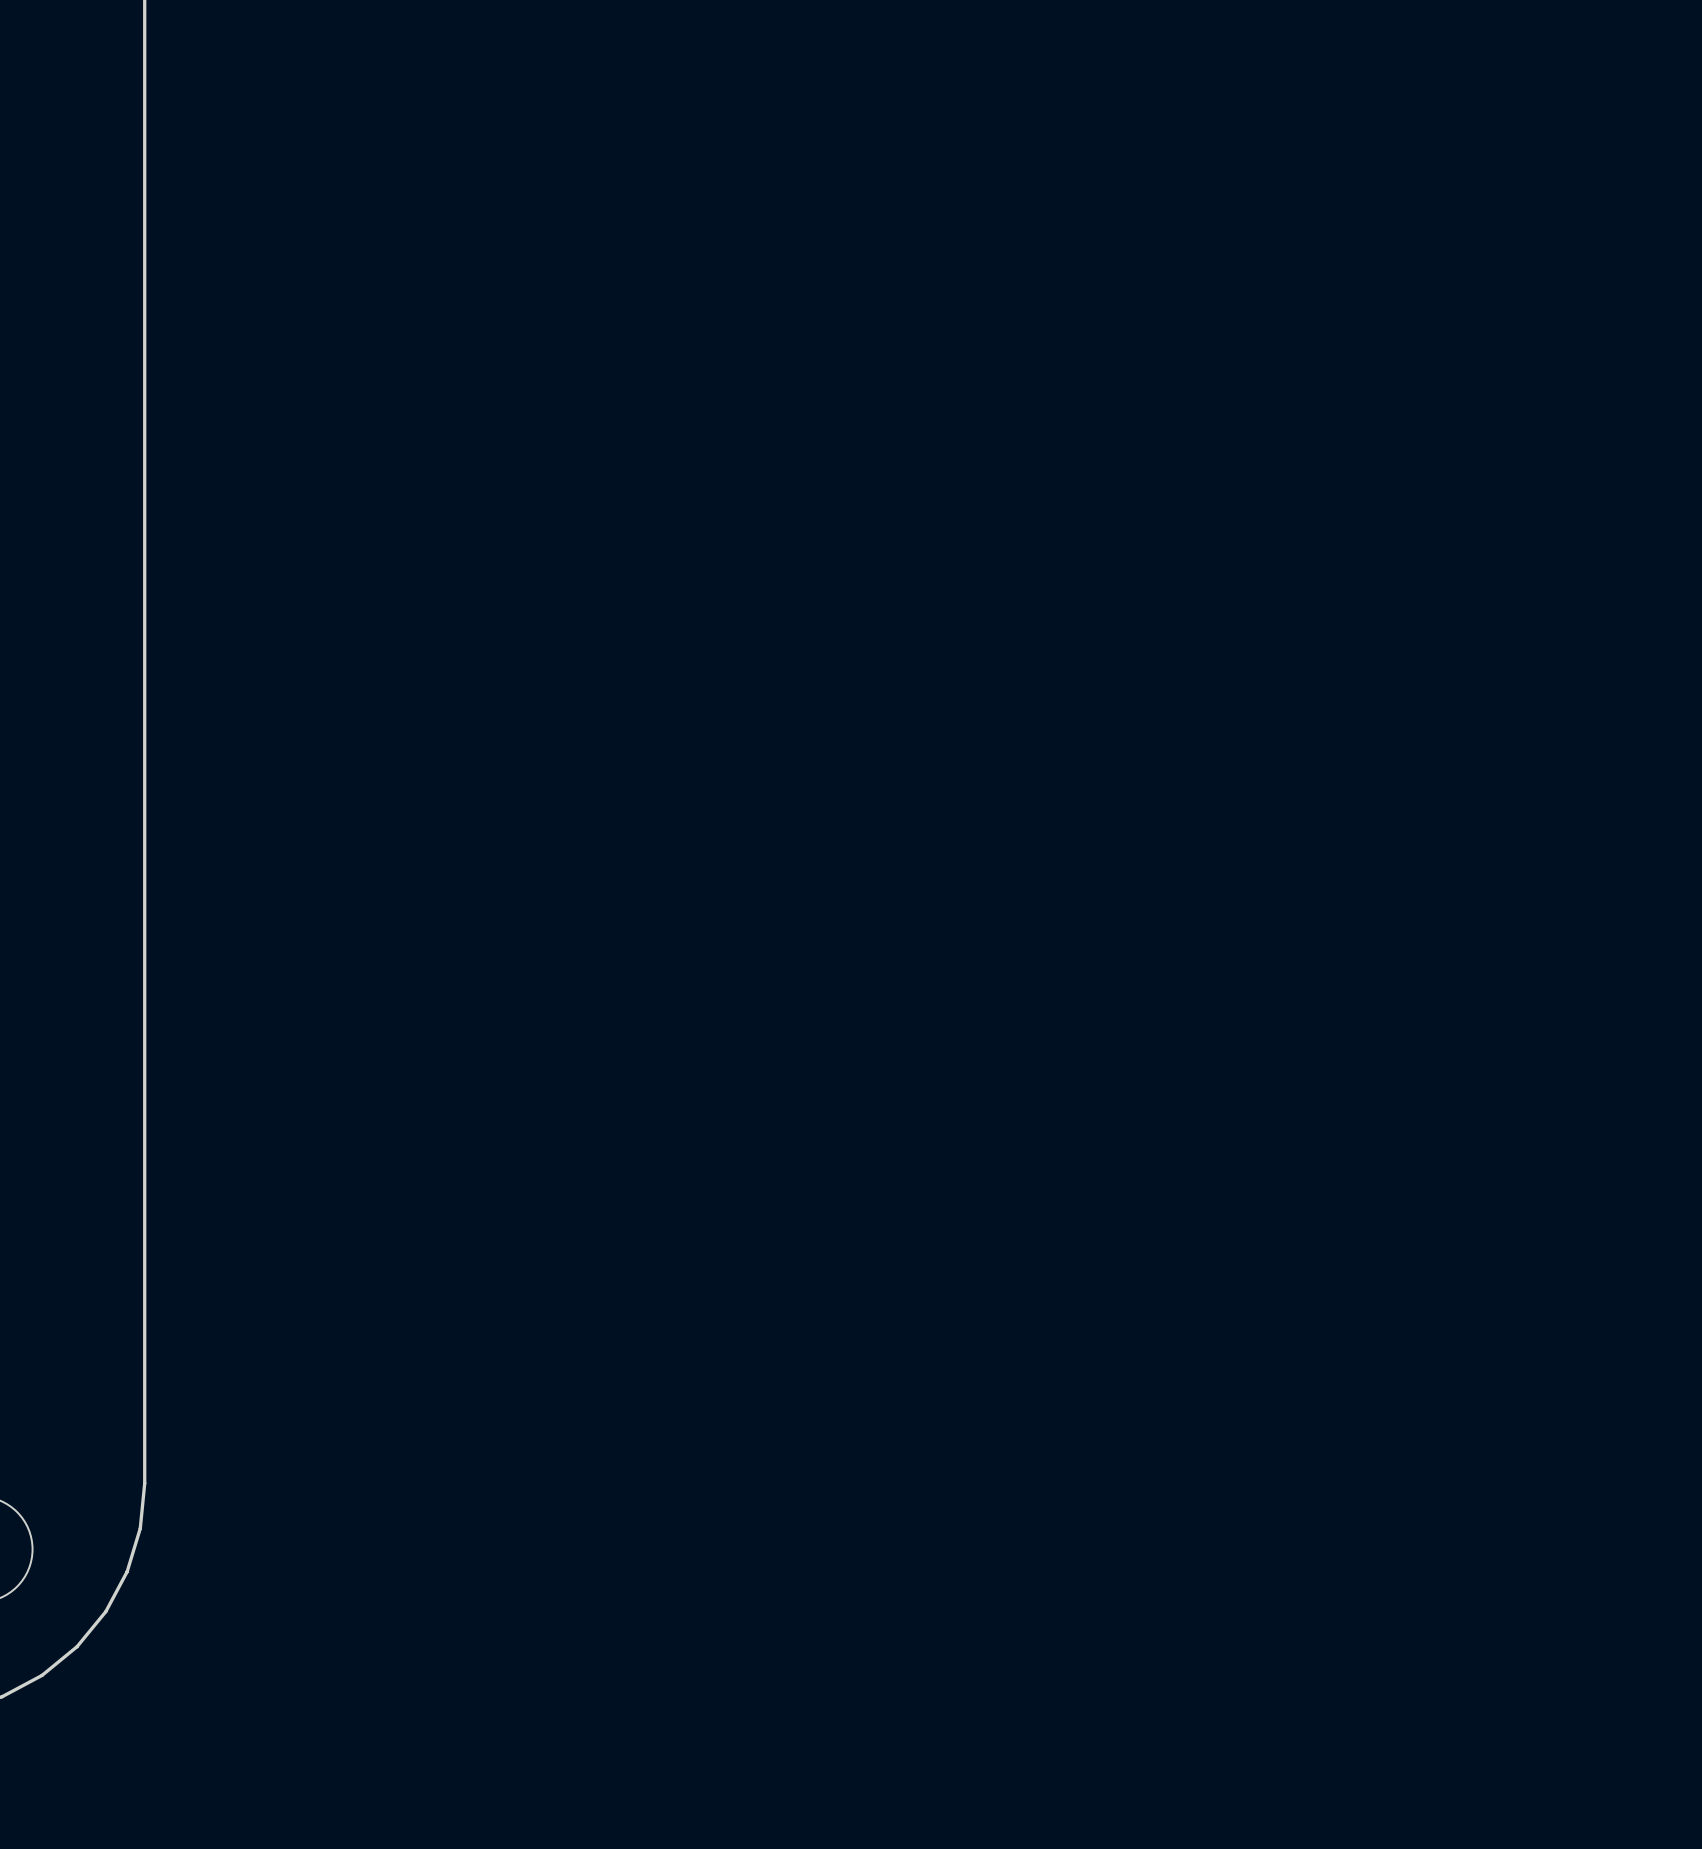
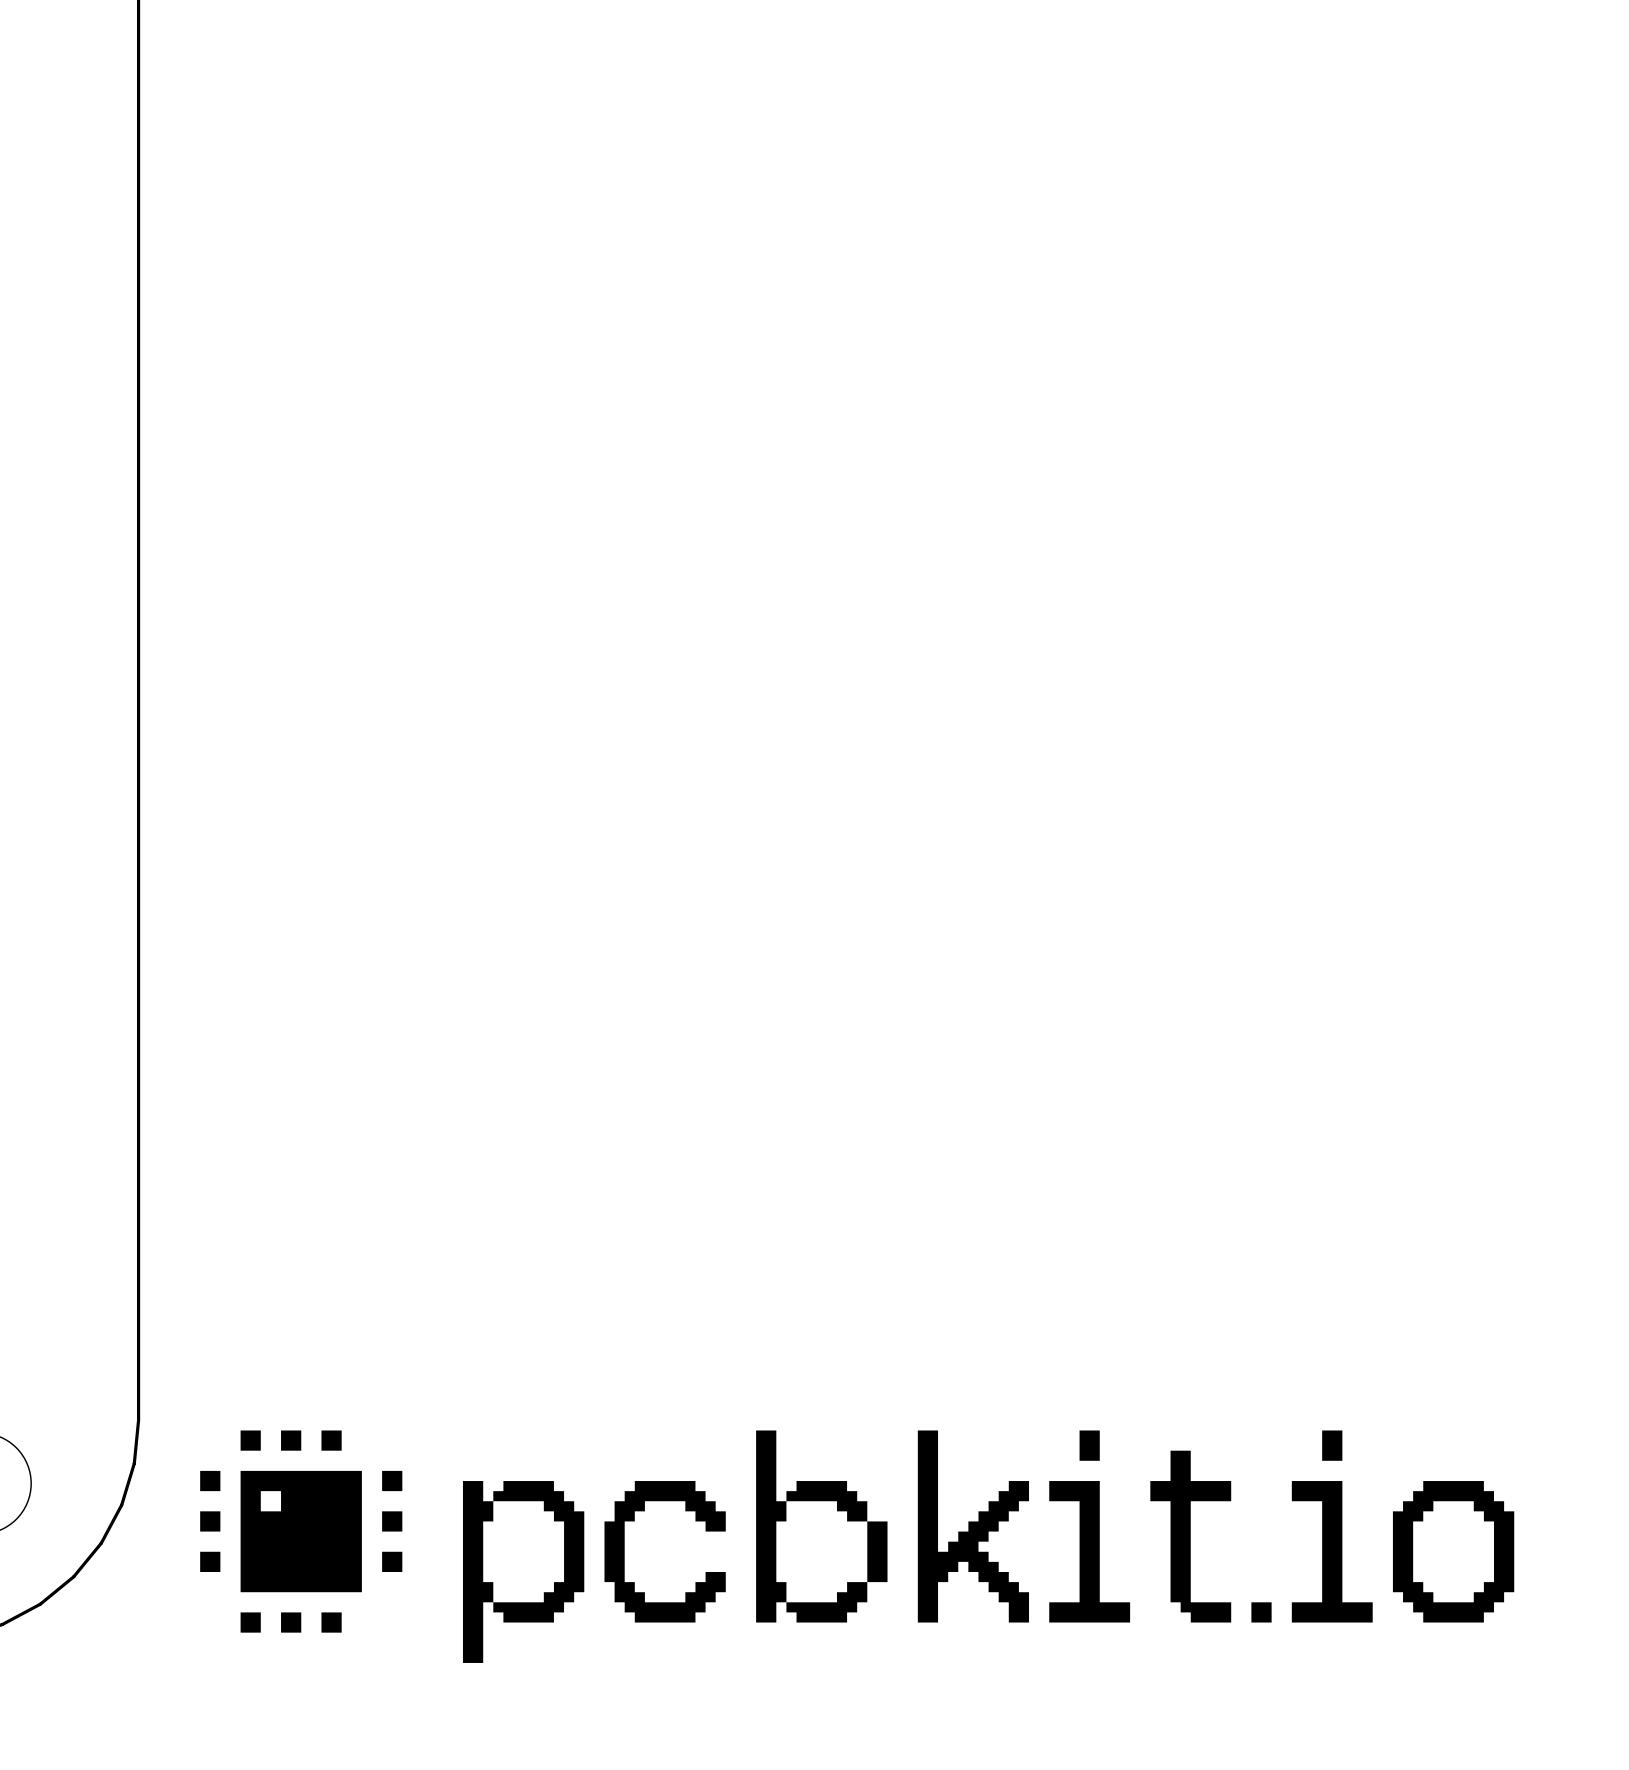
drawing: none -> [200, 1430, 1515, 1663]

